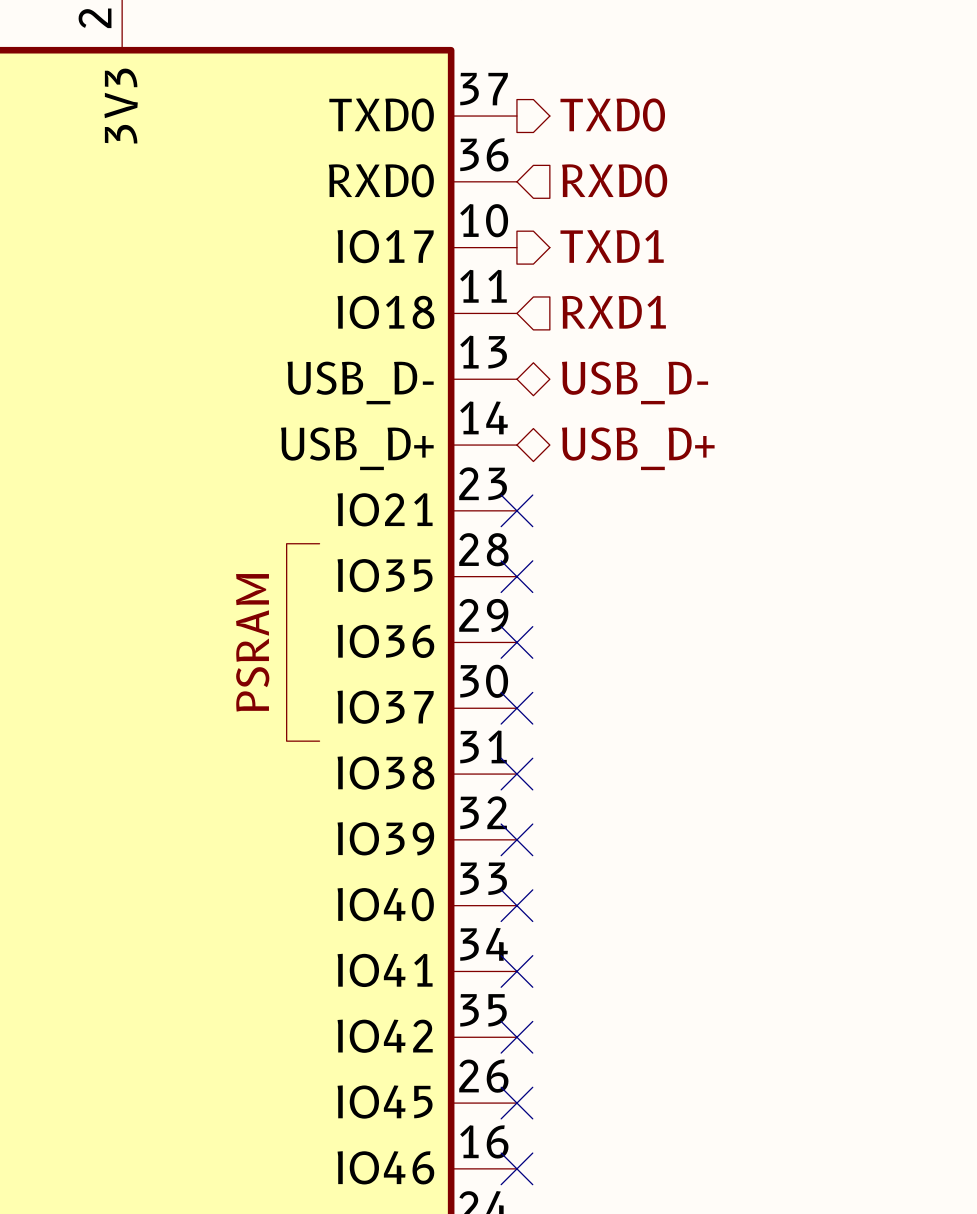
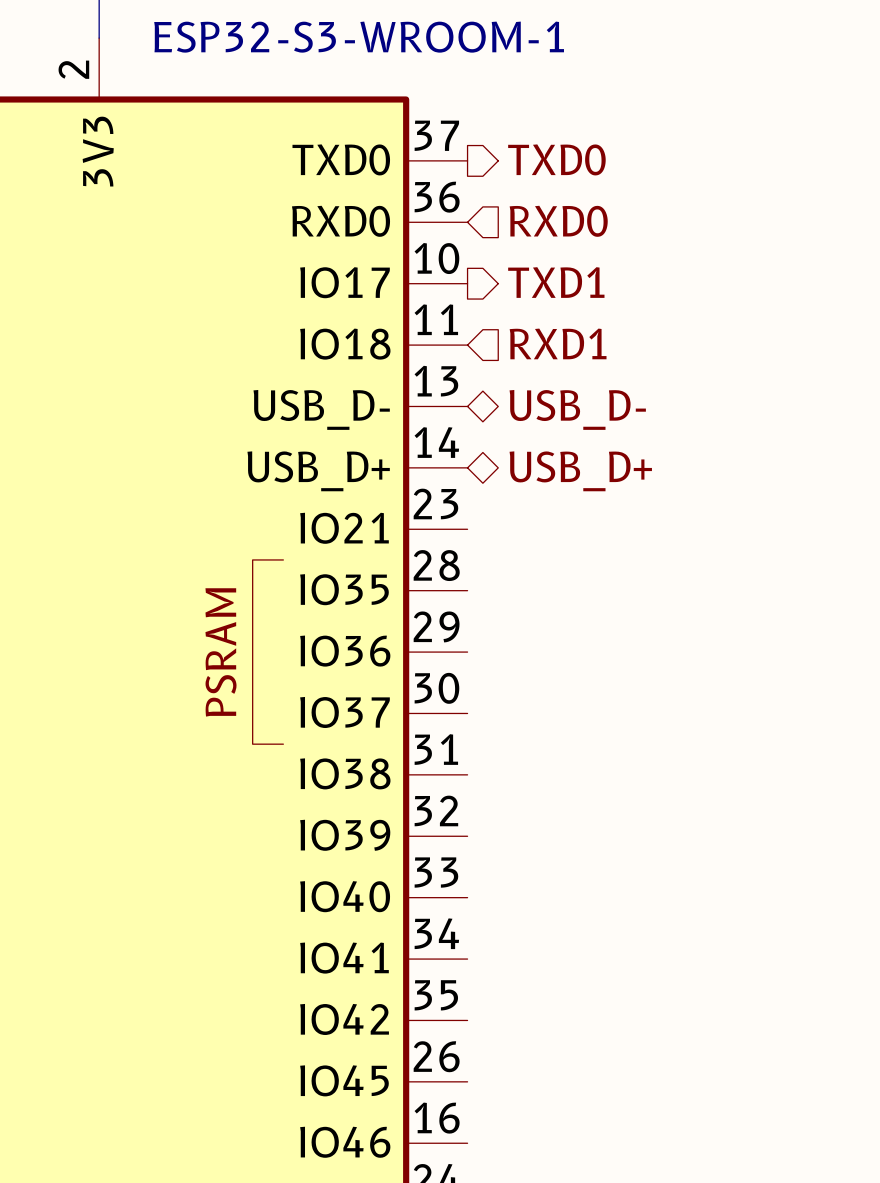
no-connect mark: (516, 510) -> none
no-connect mark: (516, 576) -> none
no-connect mark: (516, 642) -> none
no-connect mark: (516, 708) -> none
no-connect mark: (516, 774) -> none
no-connect mark: (516, 839) -> none
no-connect mark: (516, 905) -> none
no-connect mark: (516, 971) -> none
no-connect mark: (516, 1037) -> none
no-connect mark: (516, 1103) -> none
no-connect mark: (516, 1168) -> none

